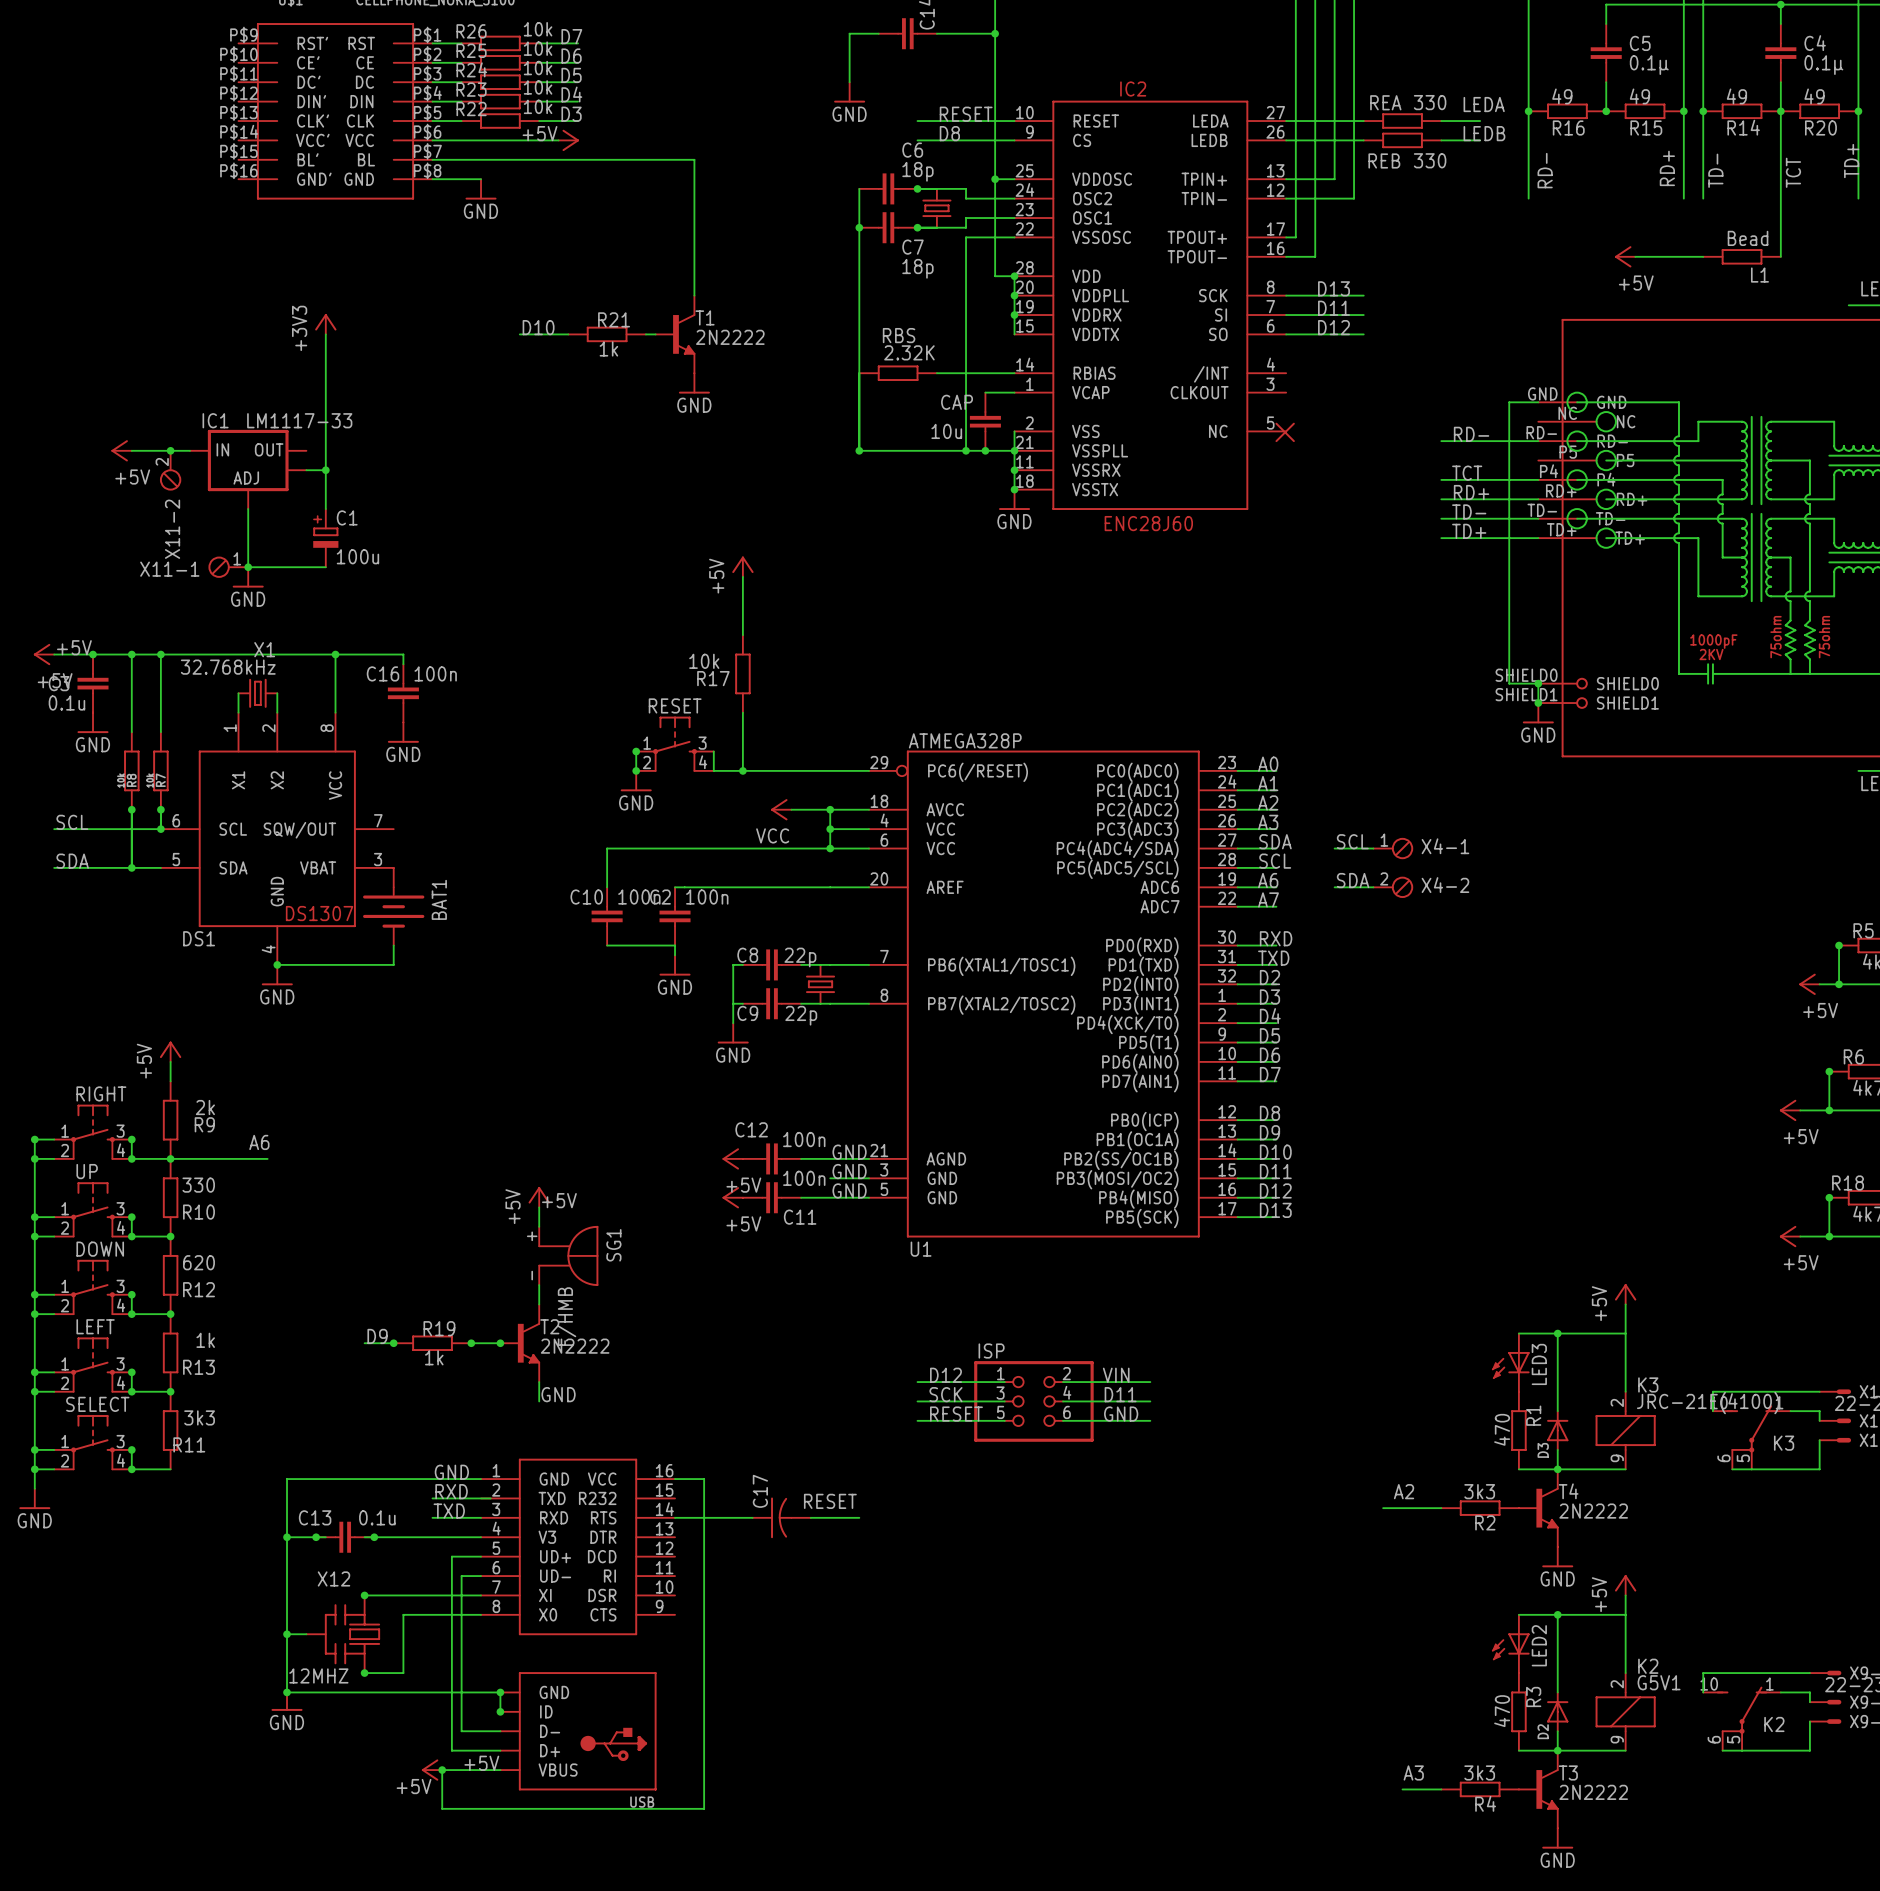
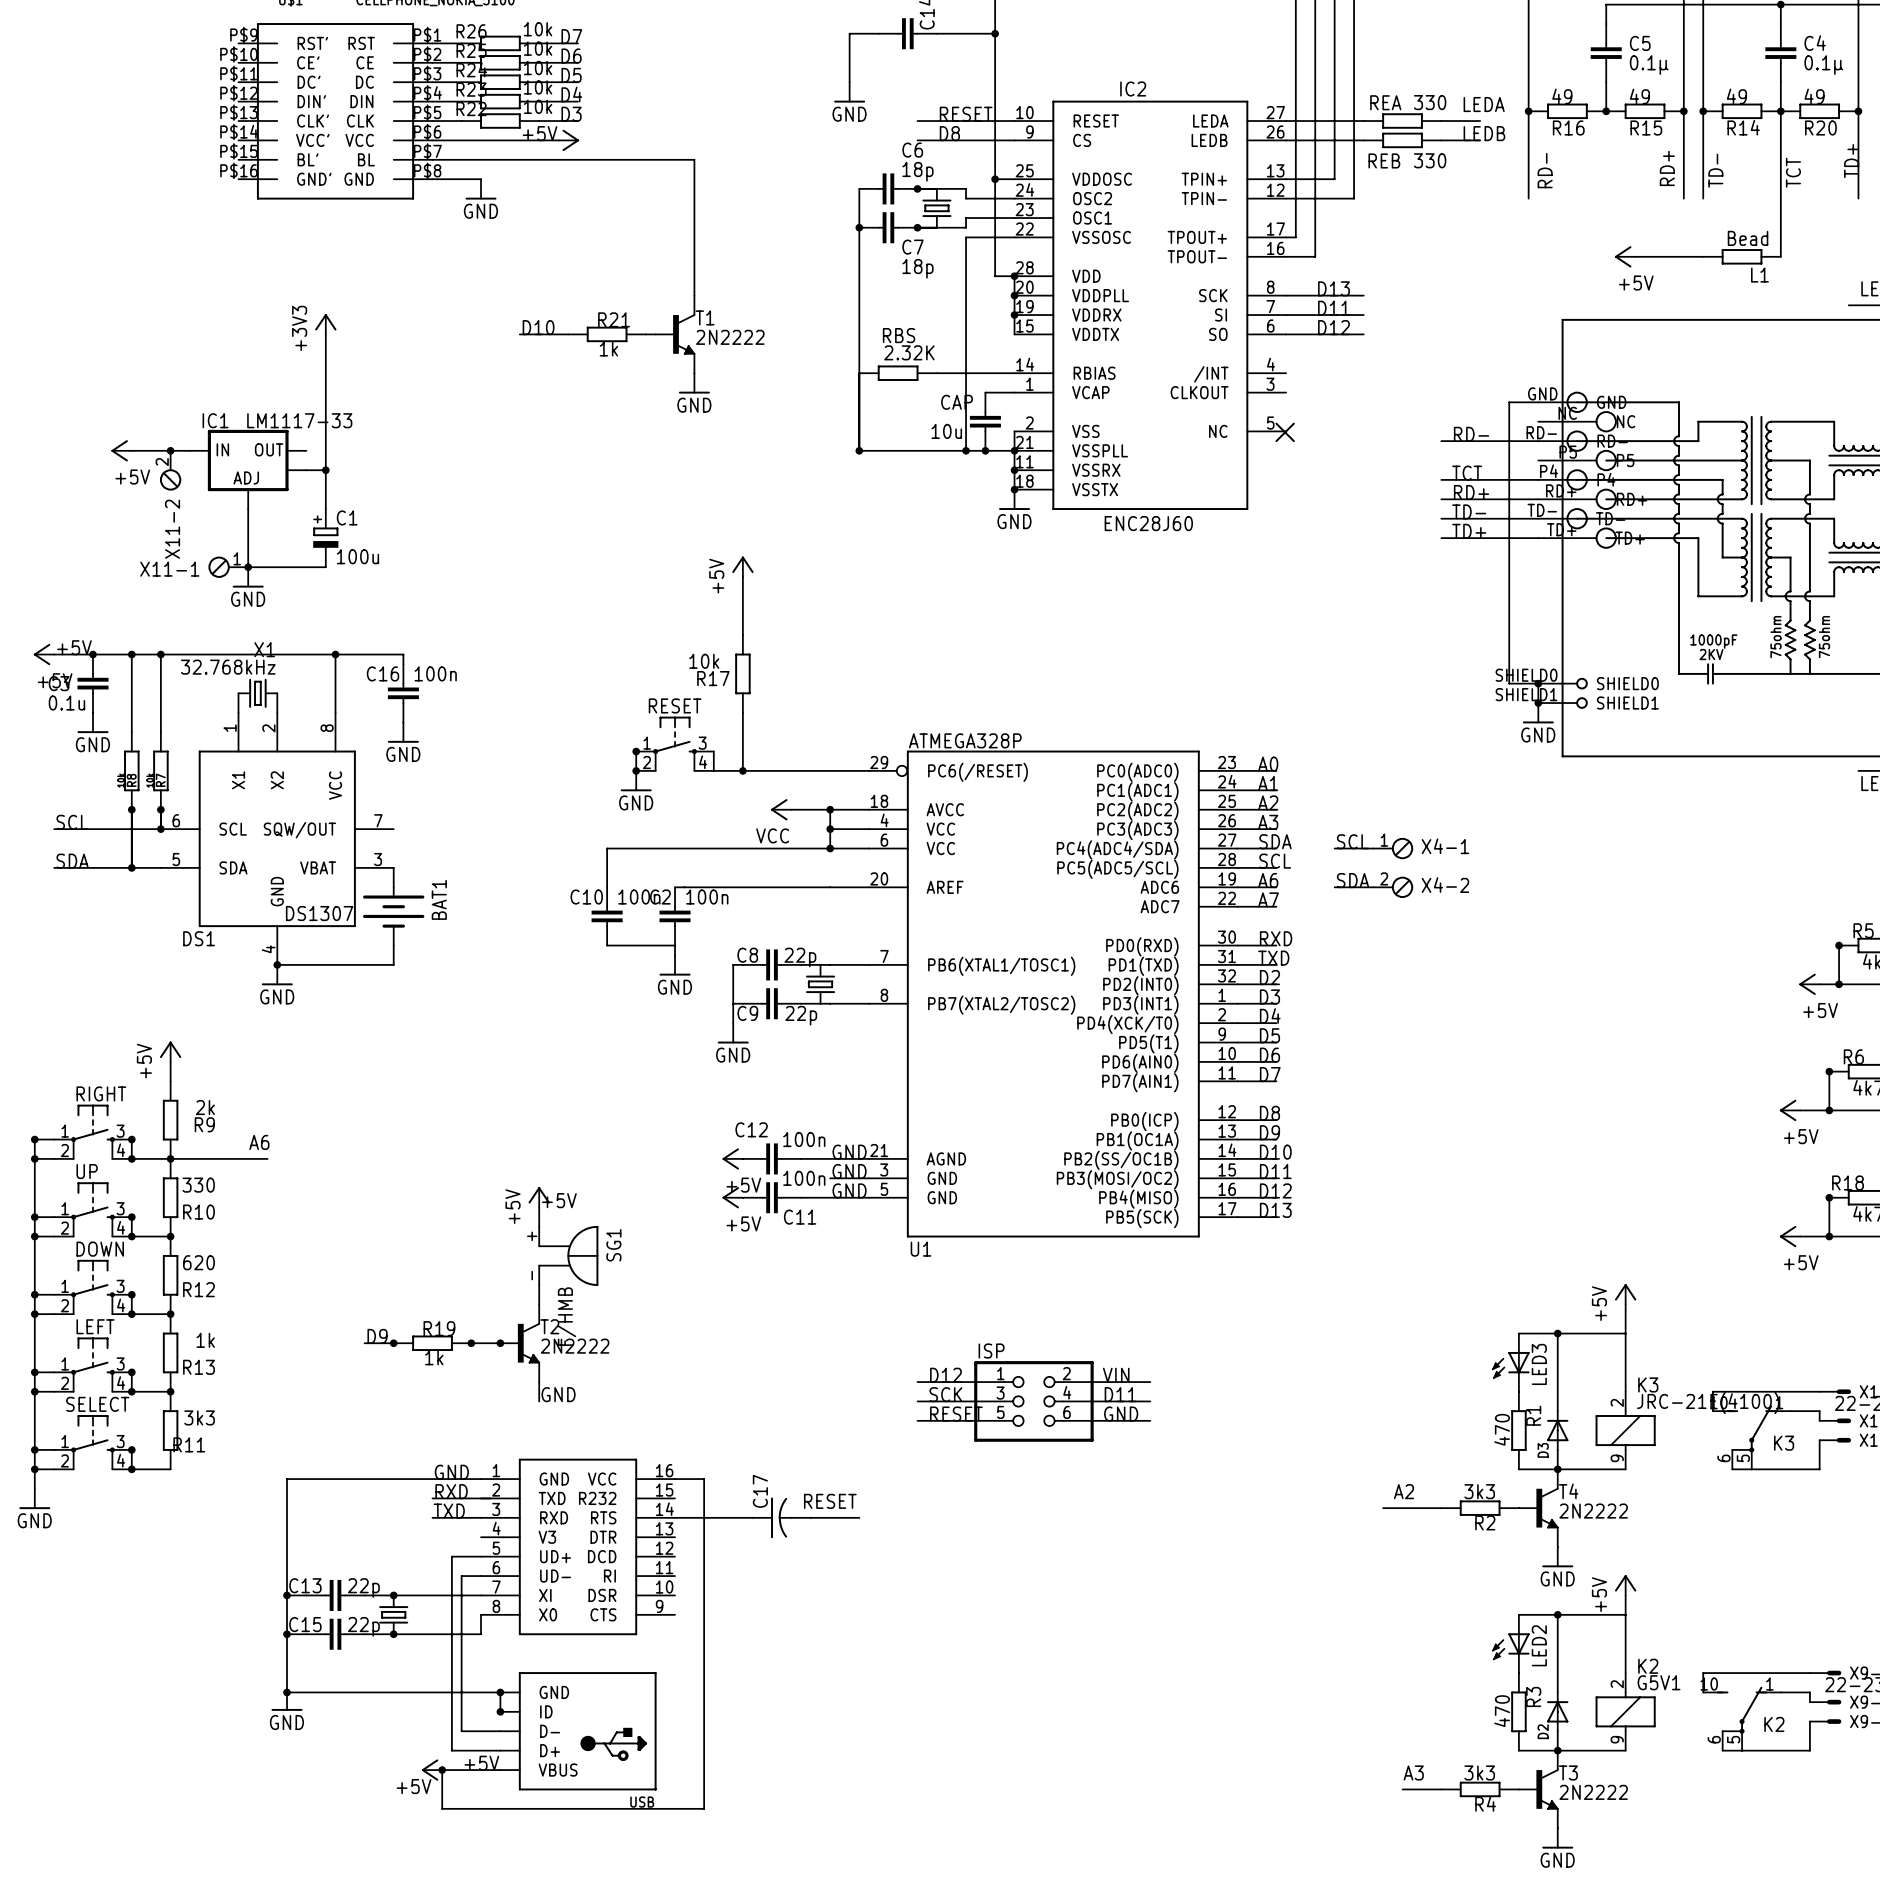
C13 name position: C13 (315, 1517) -> C13 (305, 1585)
C13 value: 0.1u (377, 1517) -> 22p (363, 1588)
wire: (287, 1537) (325, 1537) -> none
junction: (287, 1537) -> none
junction: (316, 1537) -> none
C13 position: (345, 1537) -> (335, 1595)
wire: (364, 1537) (481, 1537) -> none
junction: (374, 1537) -> none
wire: none -> (287, 1595) (306, 1595)
junction: none -> (287, 1595)
junction: (364, 1595) -> none
junction: none -> (393, 1595)
part: none -> (393, 1614)
wire: (481, 1614) (403, 1614) (403, 1673) (364, 1673) -> (481, 1614) (481, 1634) (364, 1634)
C15: none -> 22p (335, 1634)
X12: 12MHZ (343, 1634) -> none
junction: none -> (393, 1634)
junction: (364, 1673) -> none

